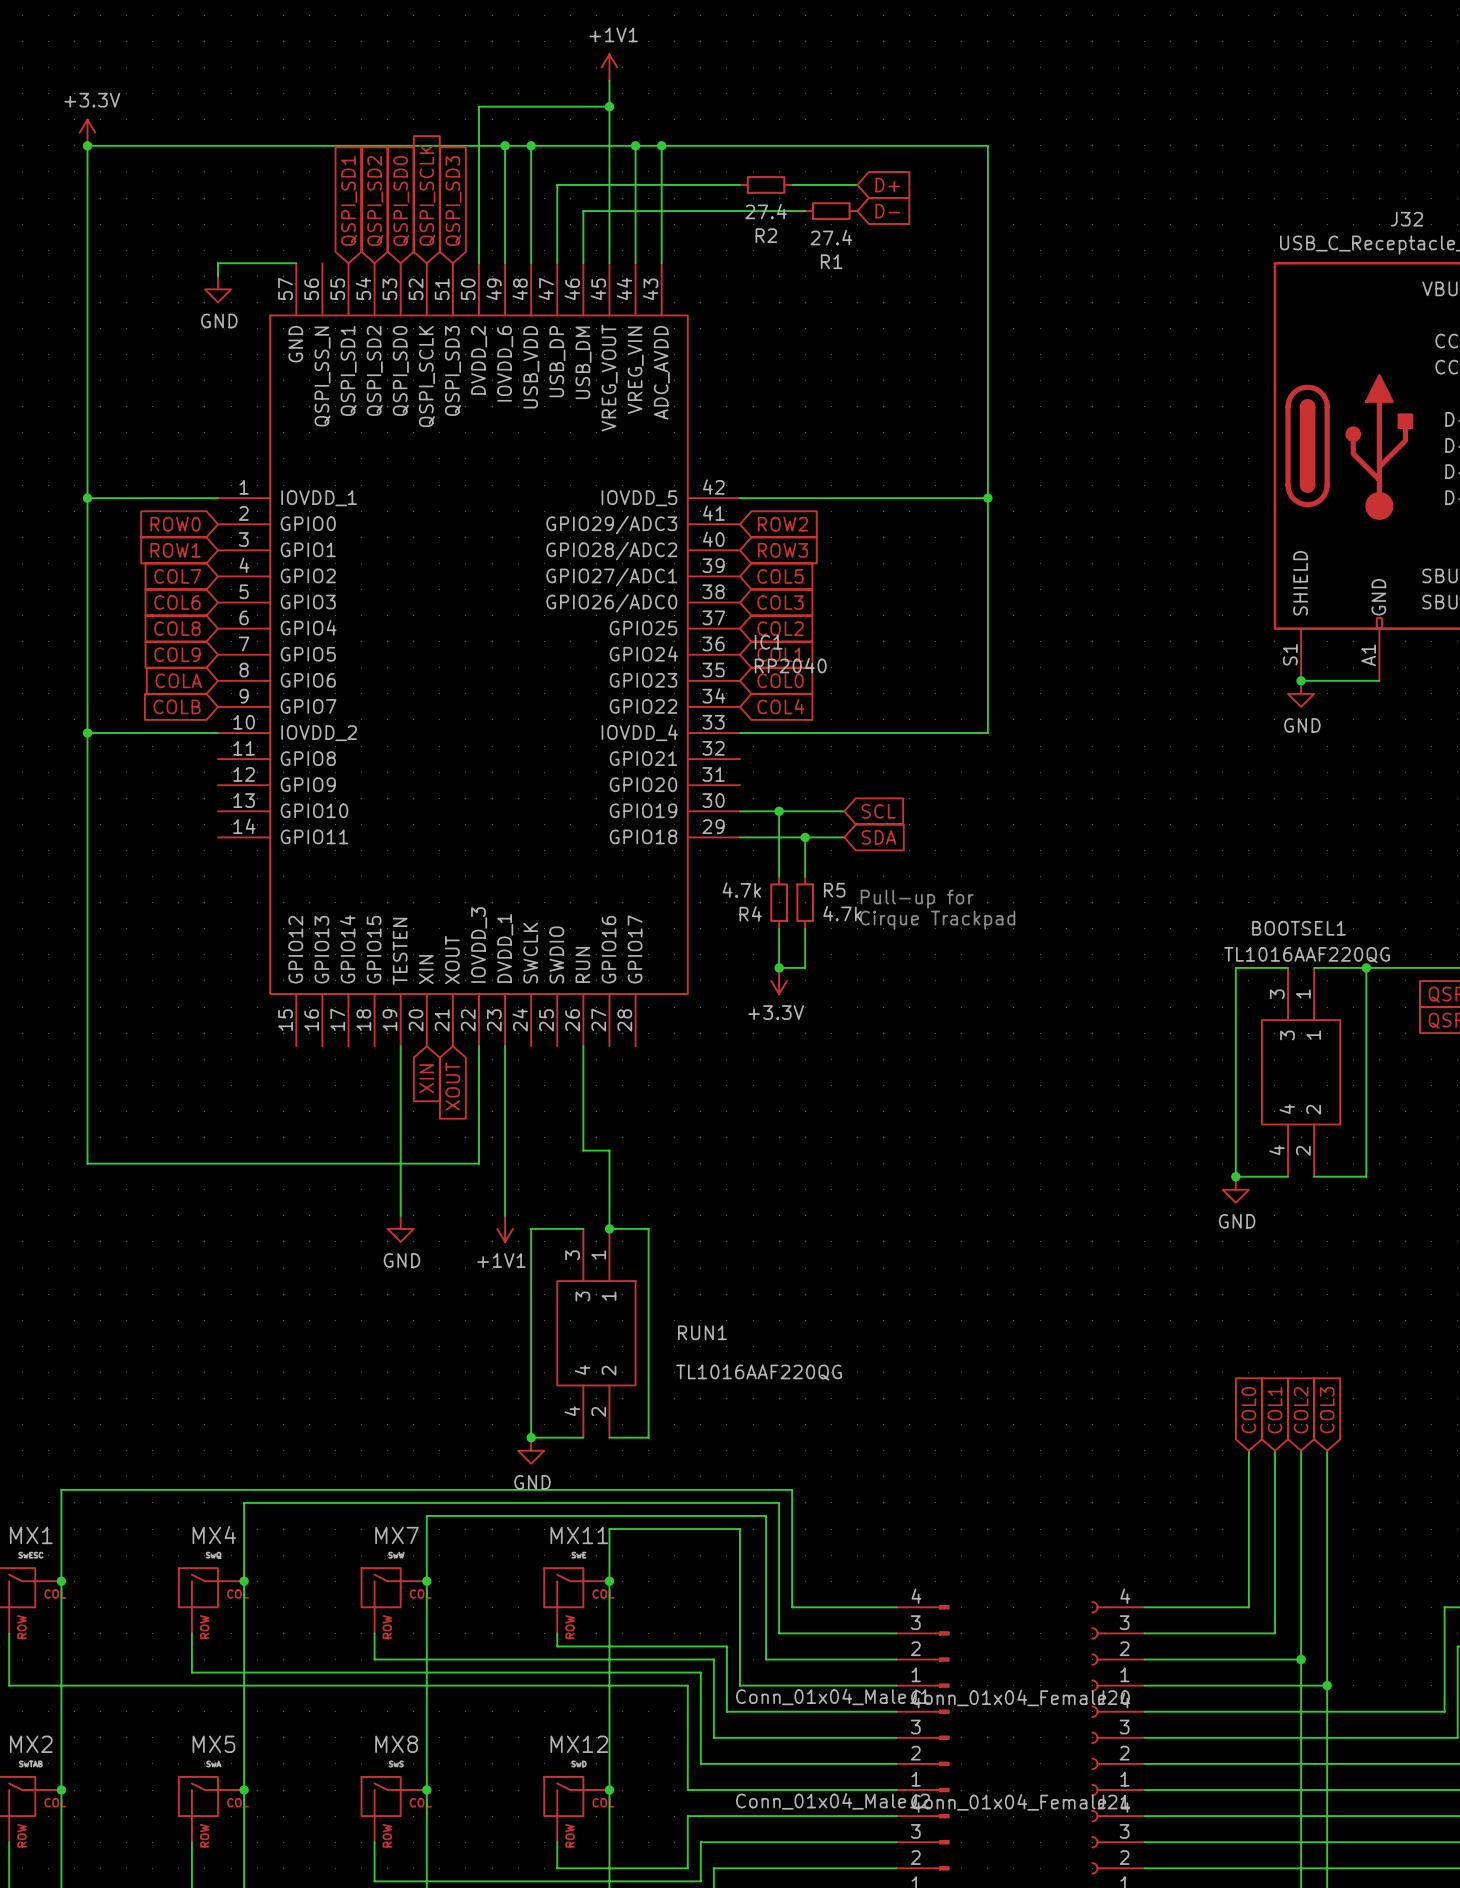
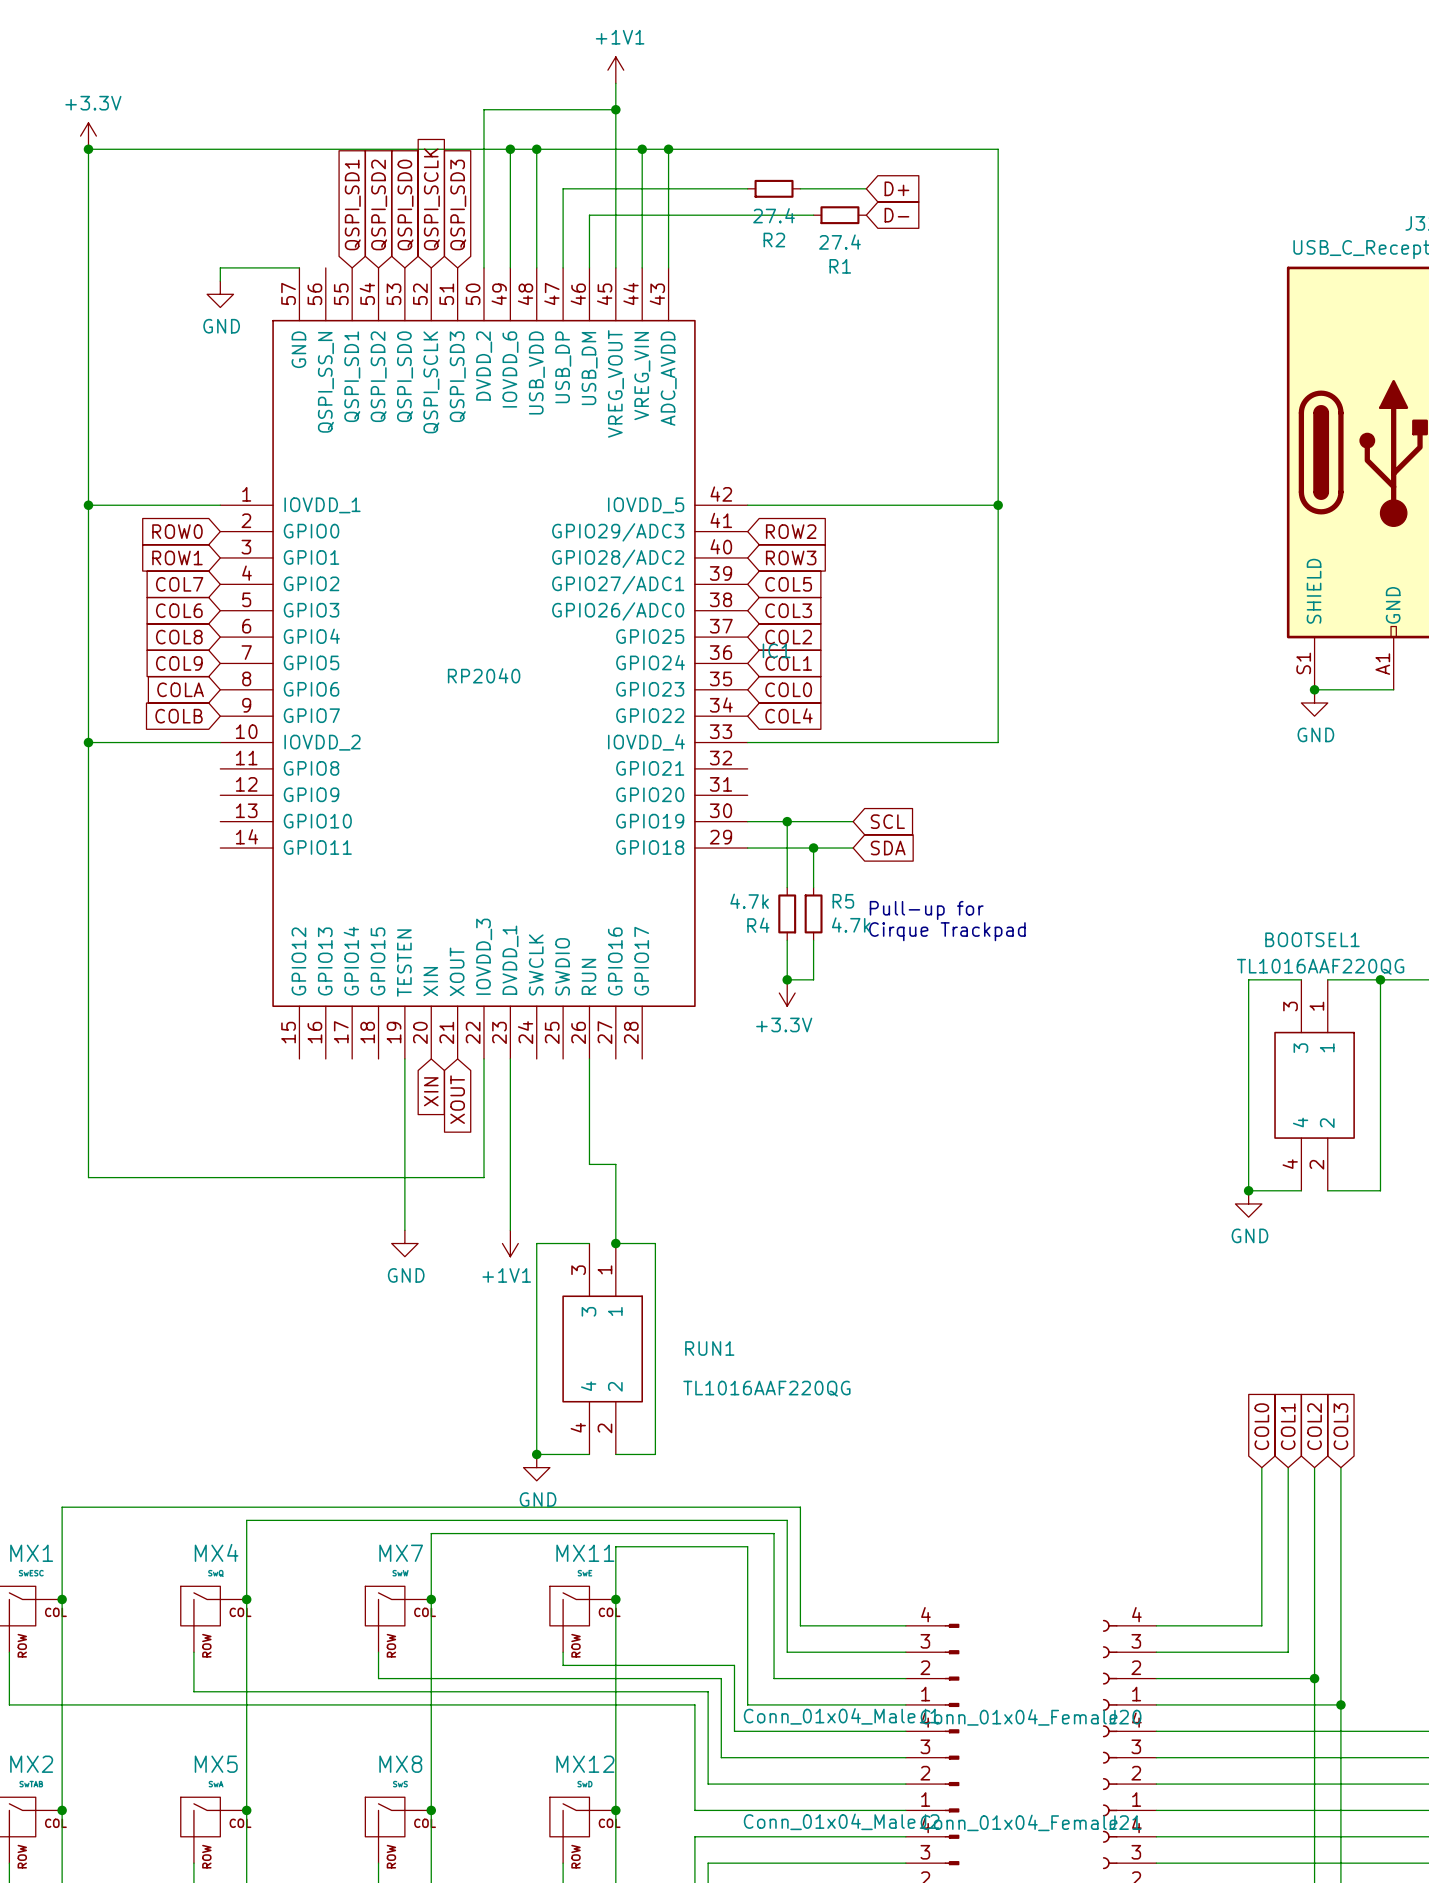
IC1 value position: RP2040 (790, 665) -> RP2040 (484, 675)

